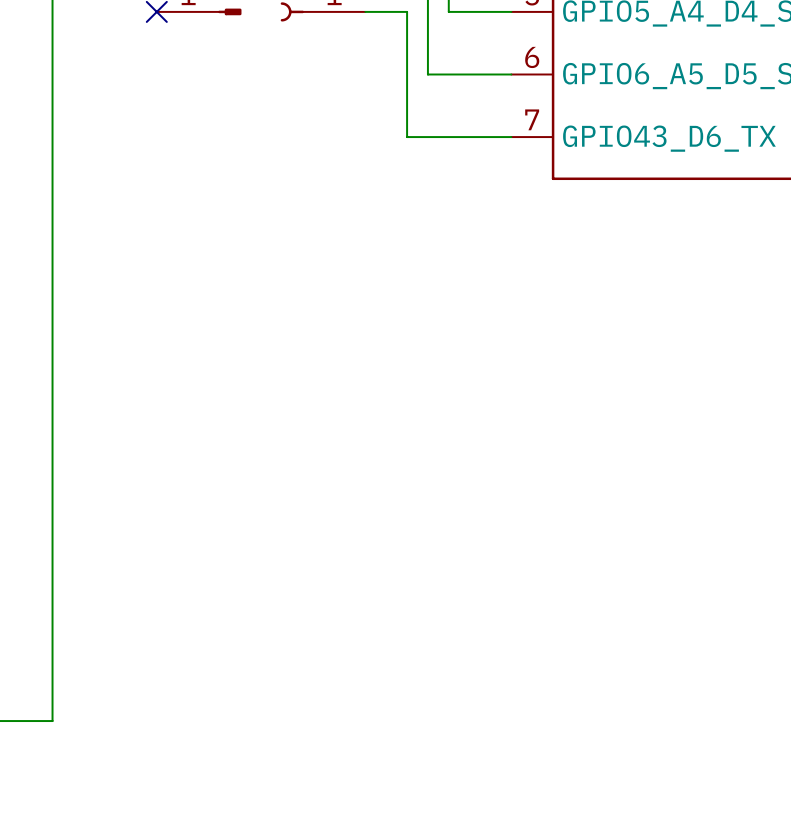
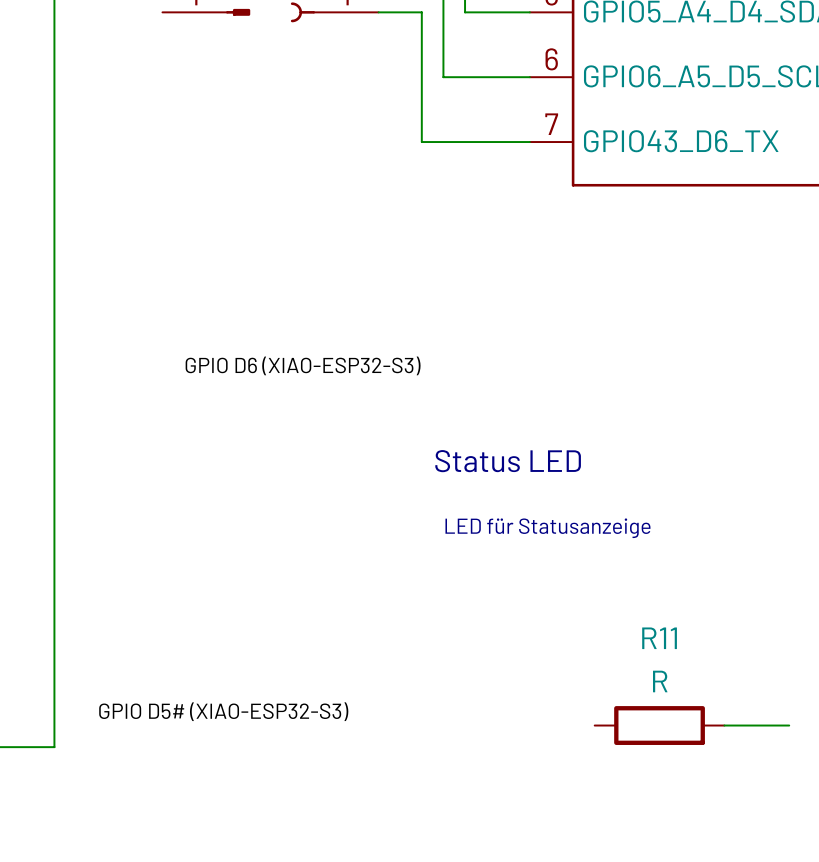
no-connect mark: (156, 11) -> none
label: none -> GPIO D6 (XIAO-ESP32-S3) (303, 365)
text: none -> Status LED (508, 461)
text: none -> LED für Statusanzeige (547, 528)
label: none -> GPIO D5# (XIAO-ESP32-S3) (223, 711)
R11: none -> R (659, 725)
wire: none -> (724, 725) (789, 725)

